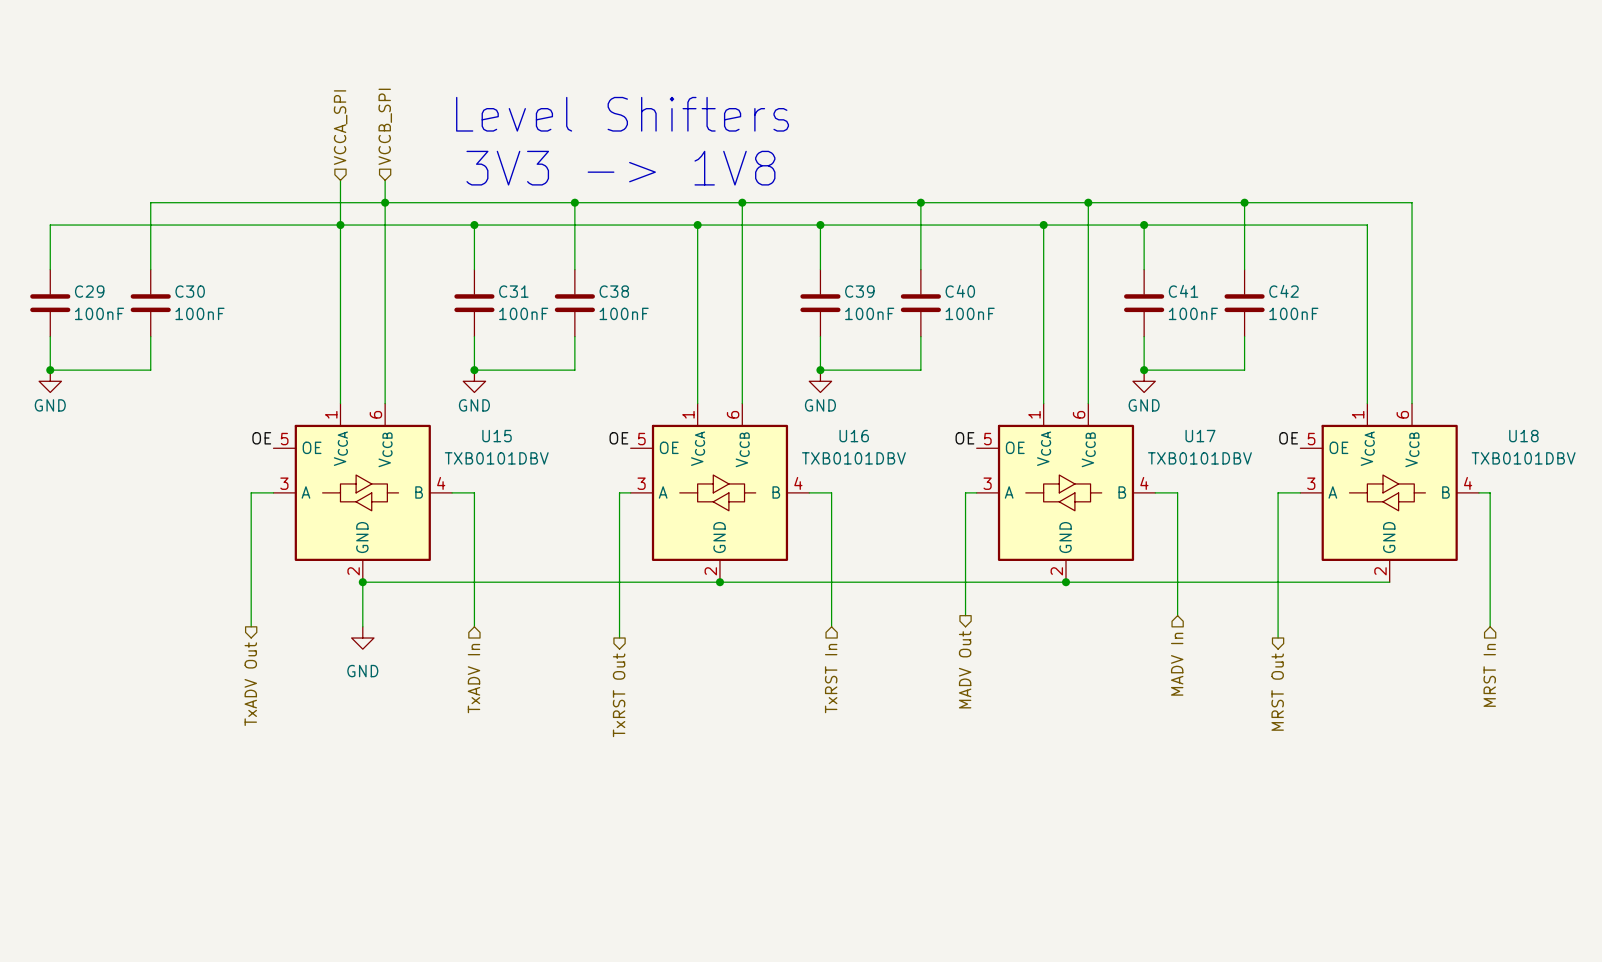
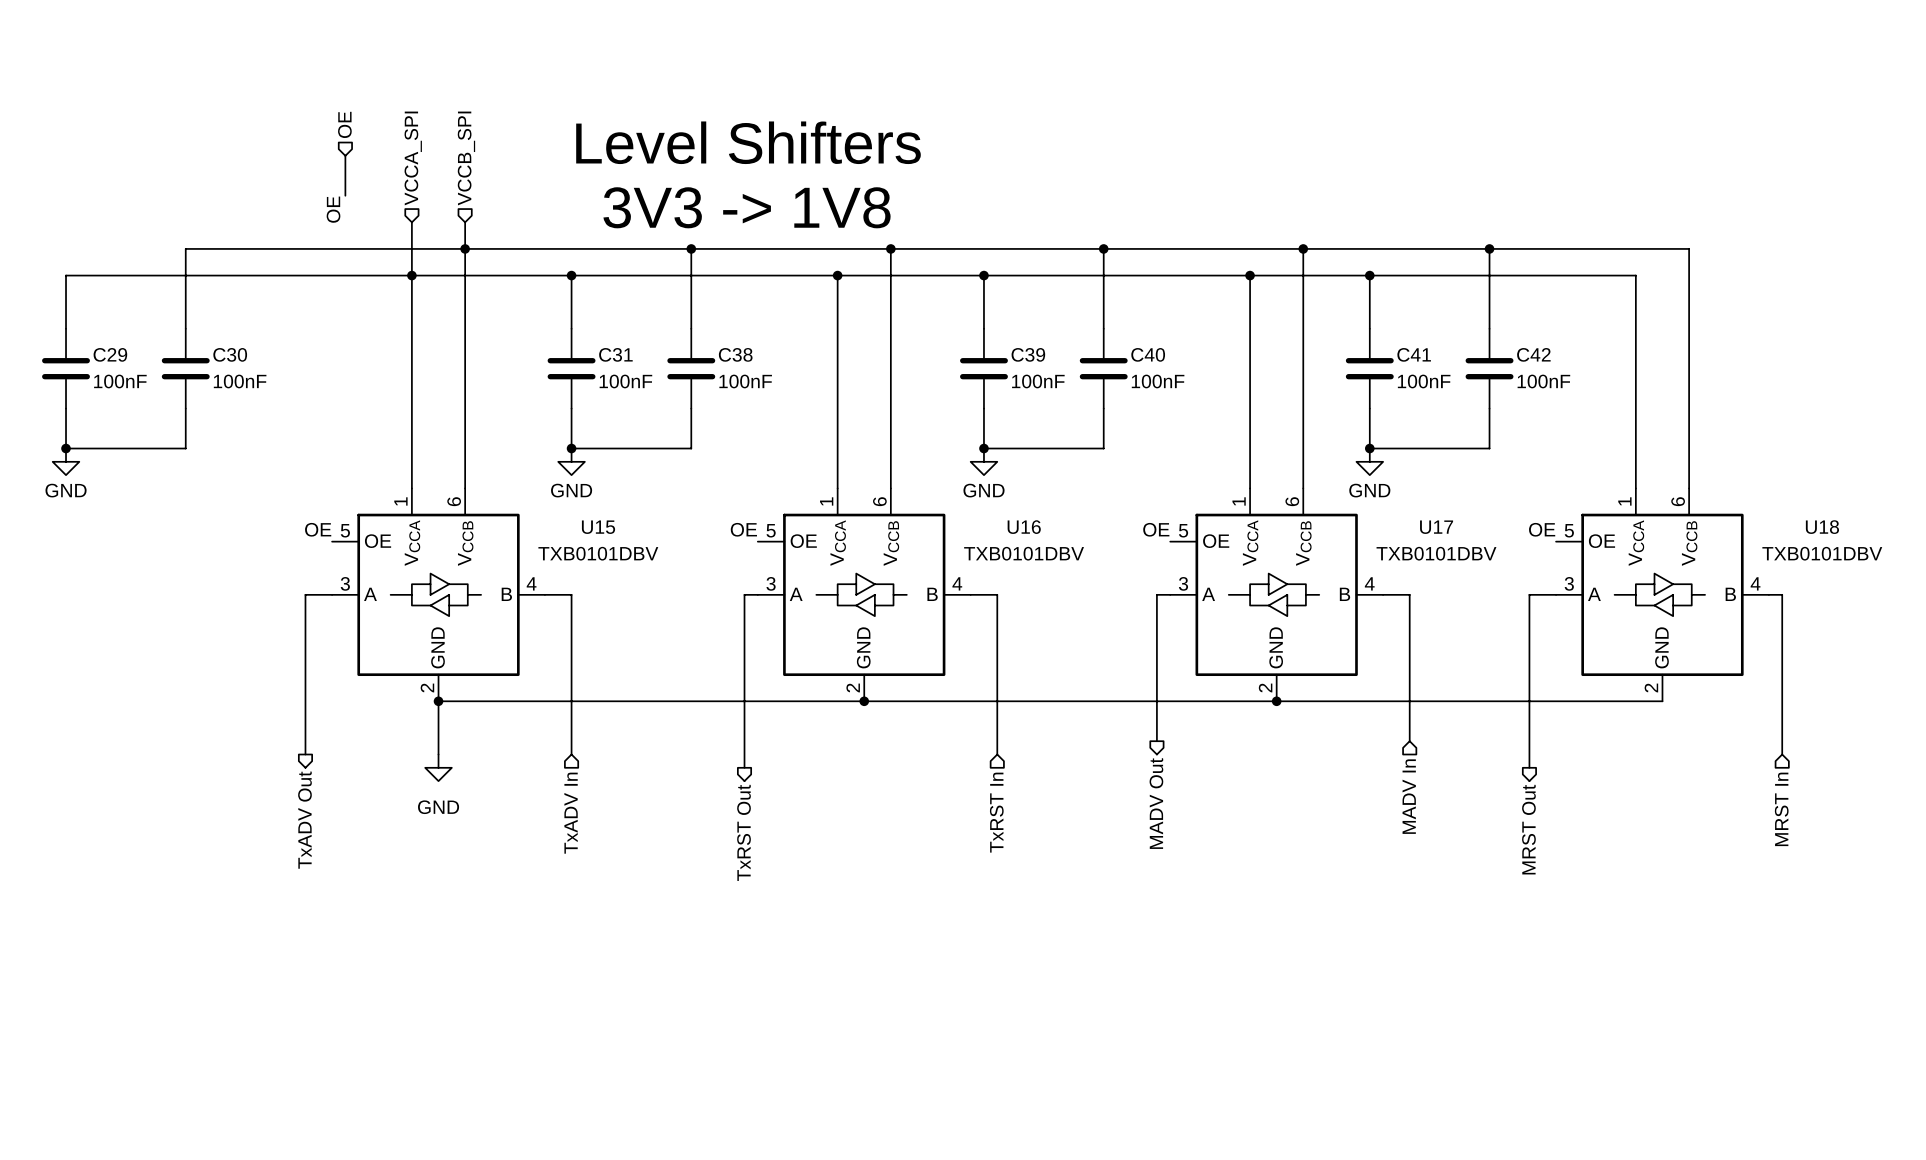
hierarchical label: none -> OE (344, 124)
wire: none -> (345, 155) (345, 195)
label: none -> OE (333, 209)

